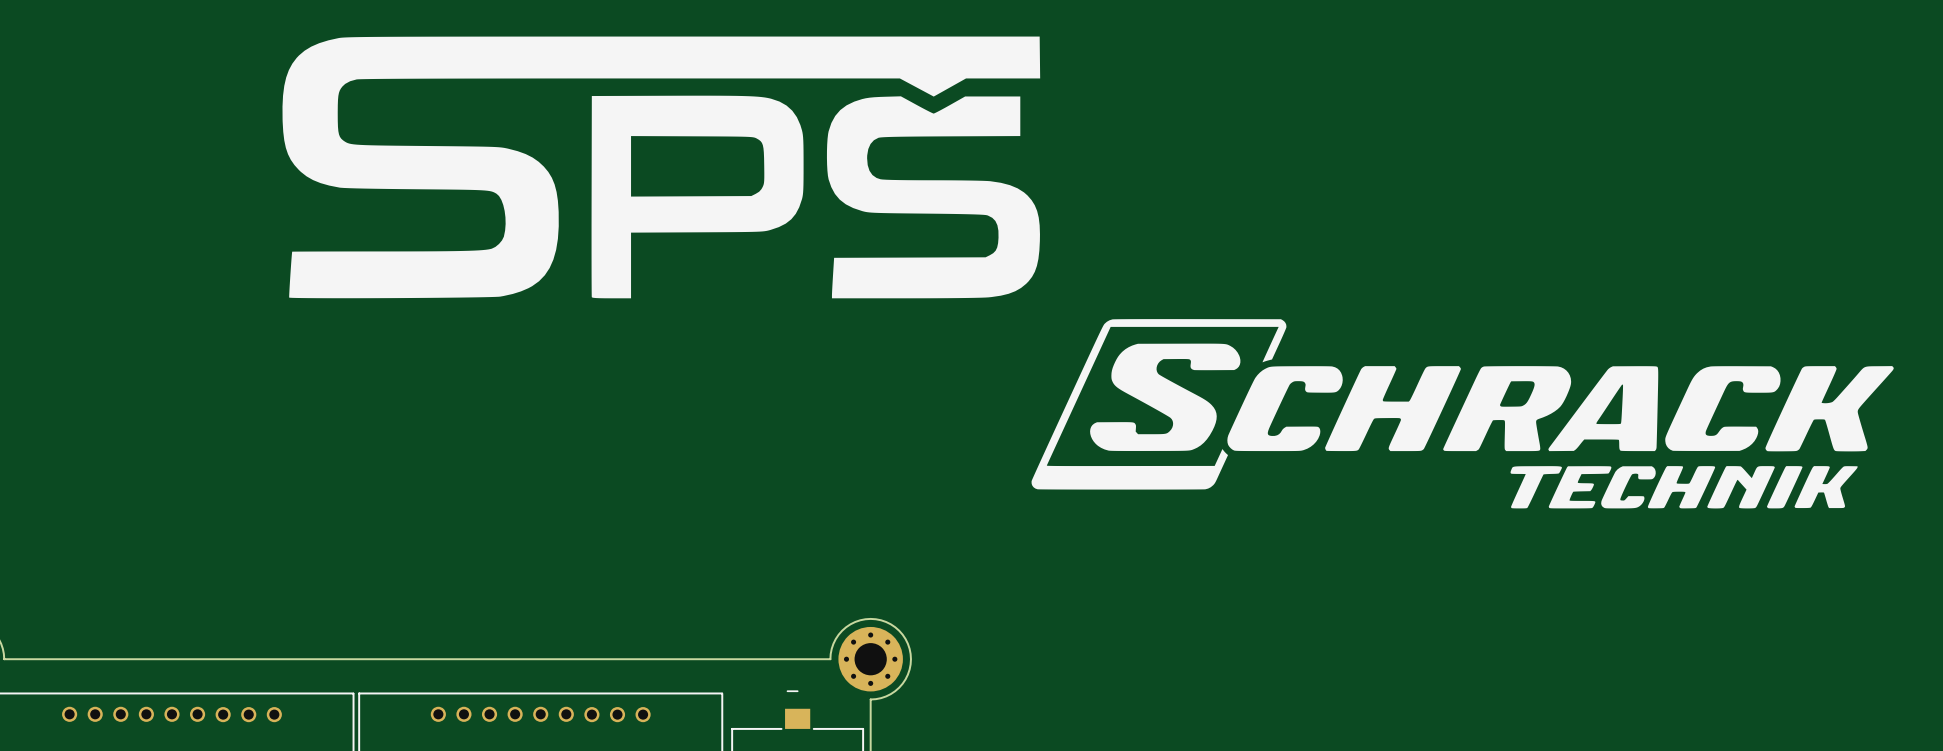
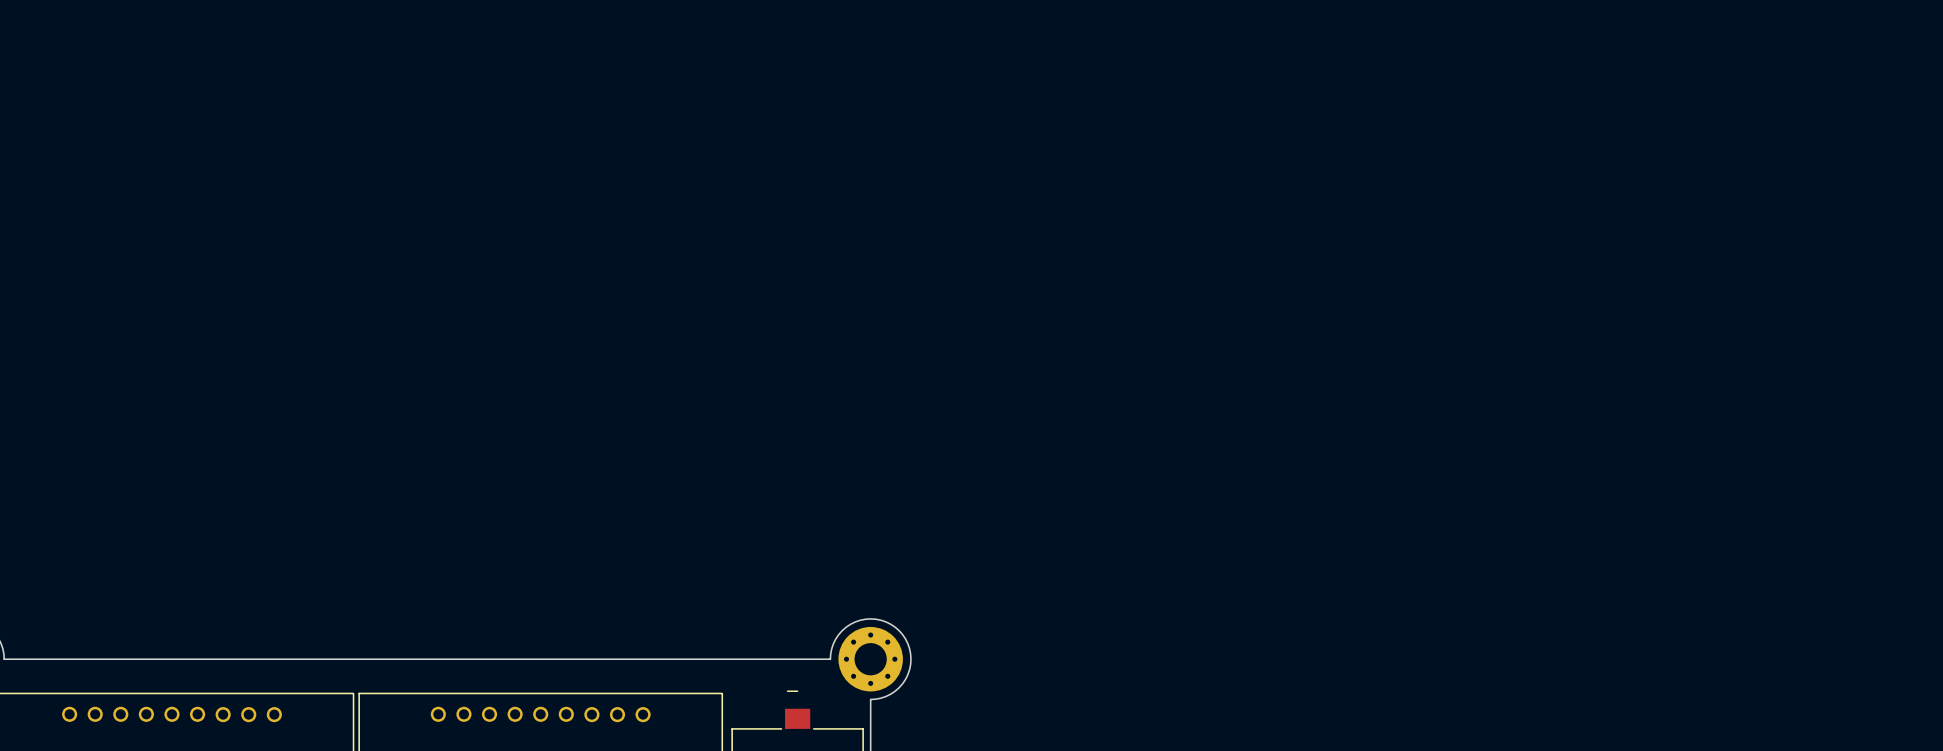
drawing: [282, 36, 1041, 299] -> none
drawing: [1031, 319, 1894, 509] -> none

